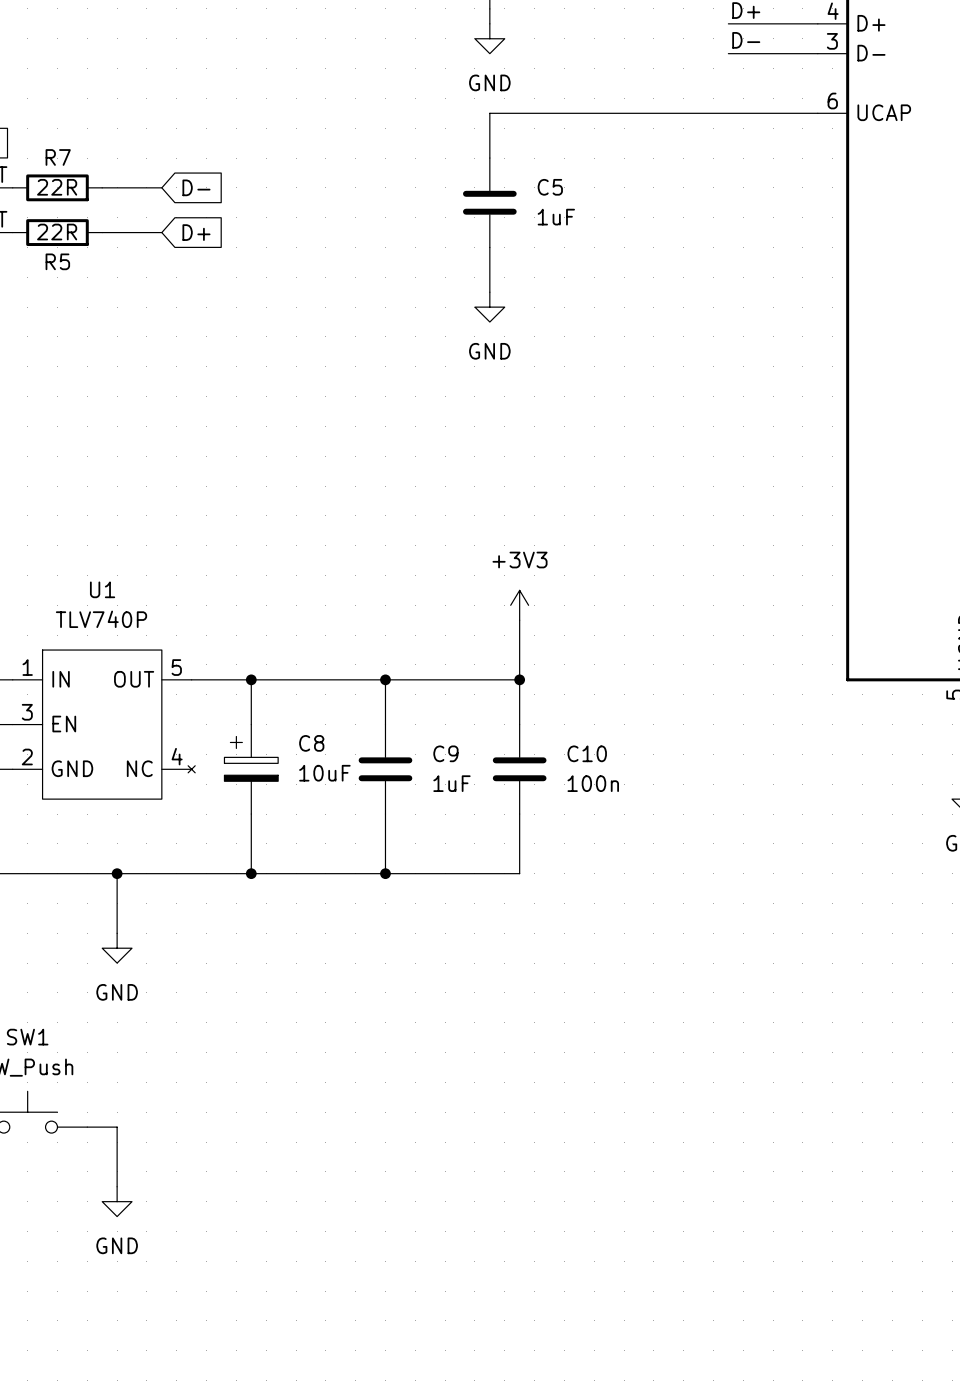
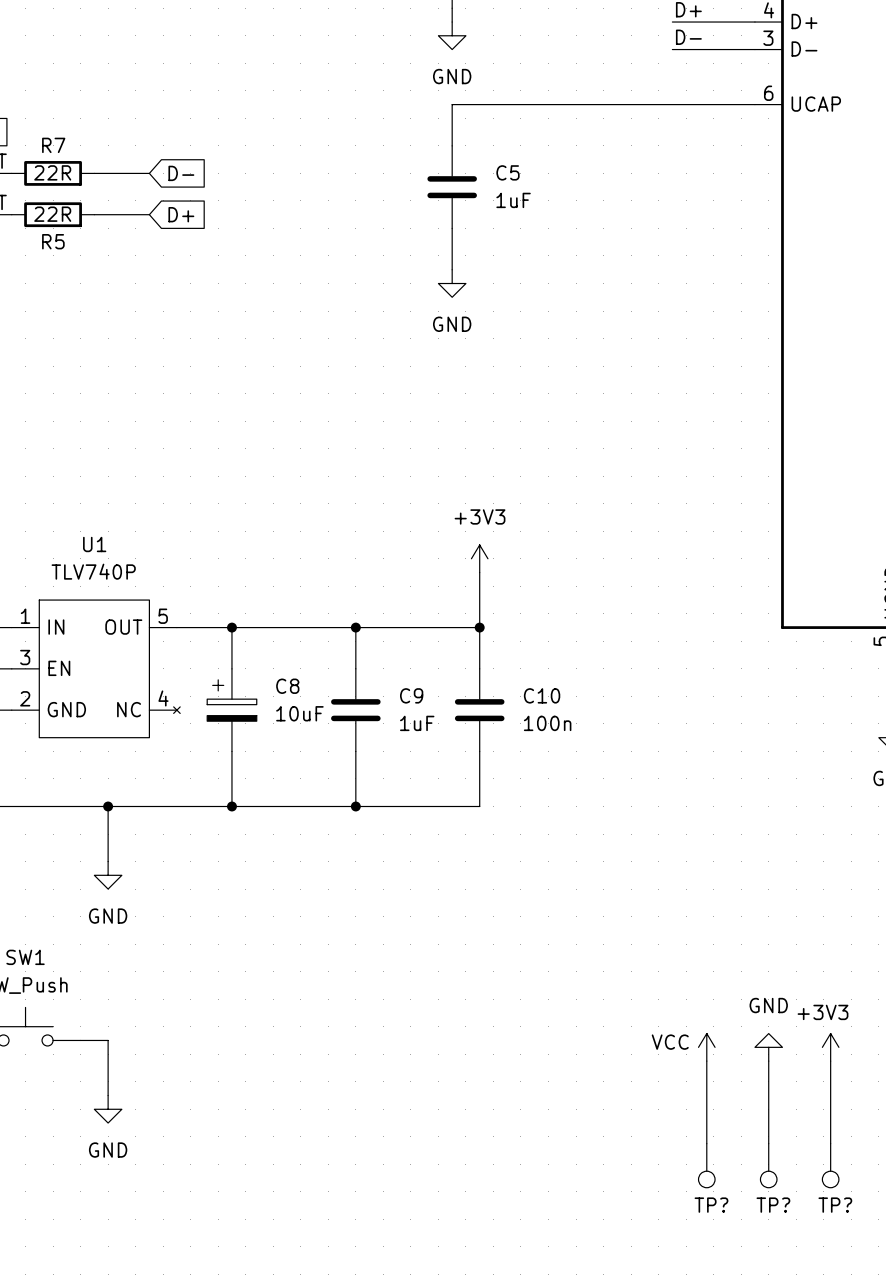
power symbol: none -> VCC (706, 1047)
power symbol: none -> GND (768, 1047)
power symbol: none -> +3V3 (830, 1047)
wire: none -> (706, 1061) (706, 1143)
wire: none -> (768, 1061) (768, 1143)
wire: none -> (830, 1061) (830, 1143)
TP?: none -> (706, 1165)
TP?: none -> (768, 1165)
TP?: none -> (830, 1165)

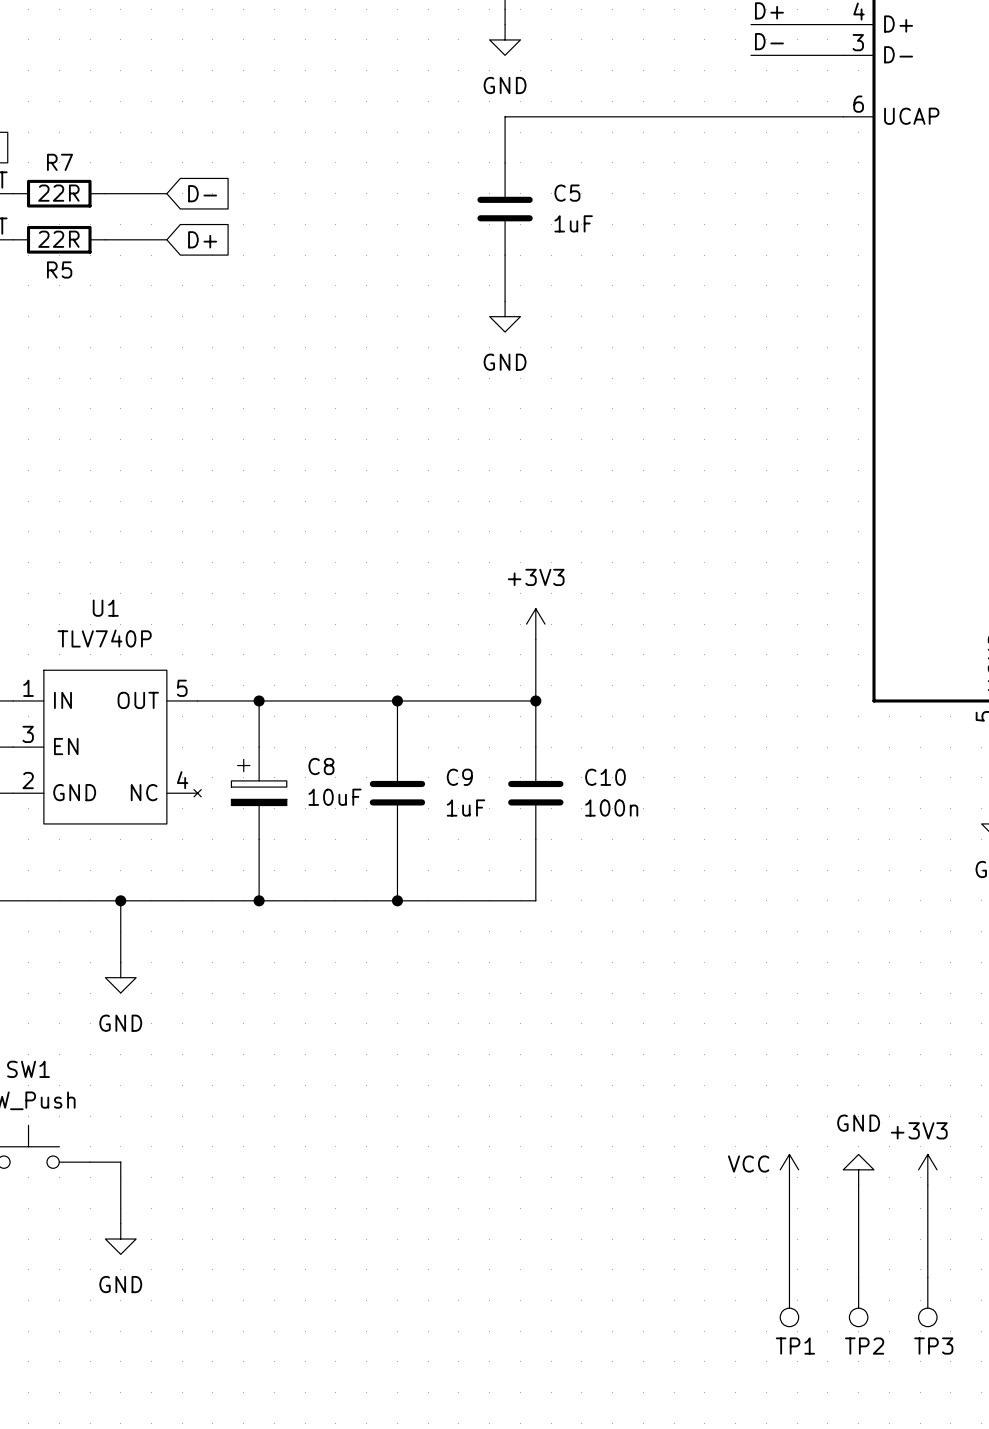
TP? name: TP? (711, 1205) -> TP1 (795, 1346)
TP? name: TP? (773, 1205) -> TP2 (864, 1346)
TP? name: TP? (835, 1205) -> TP3 (933, 1346)

